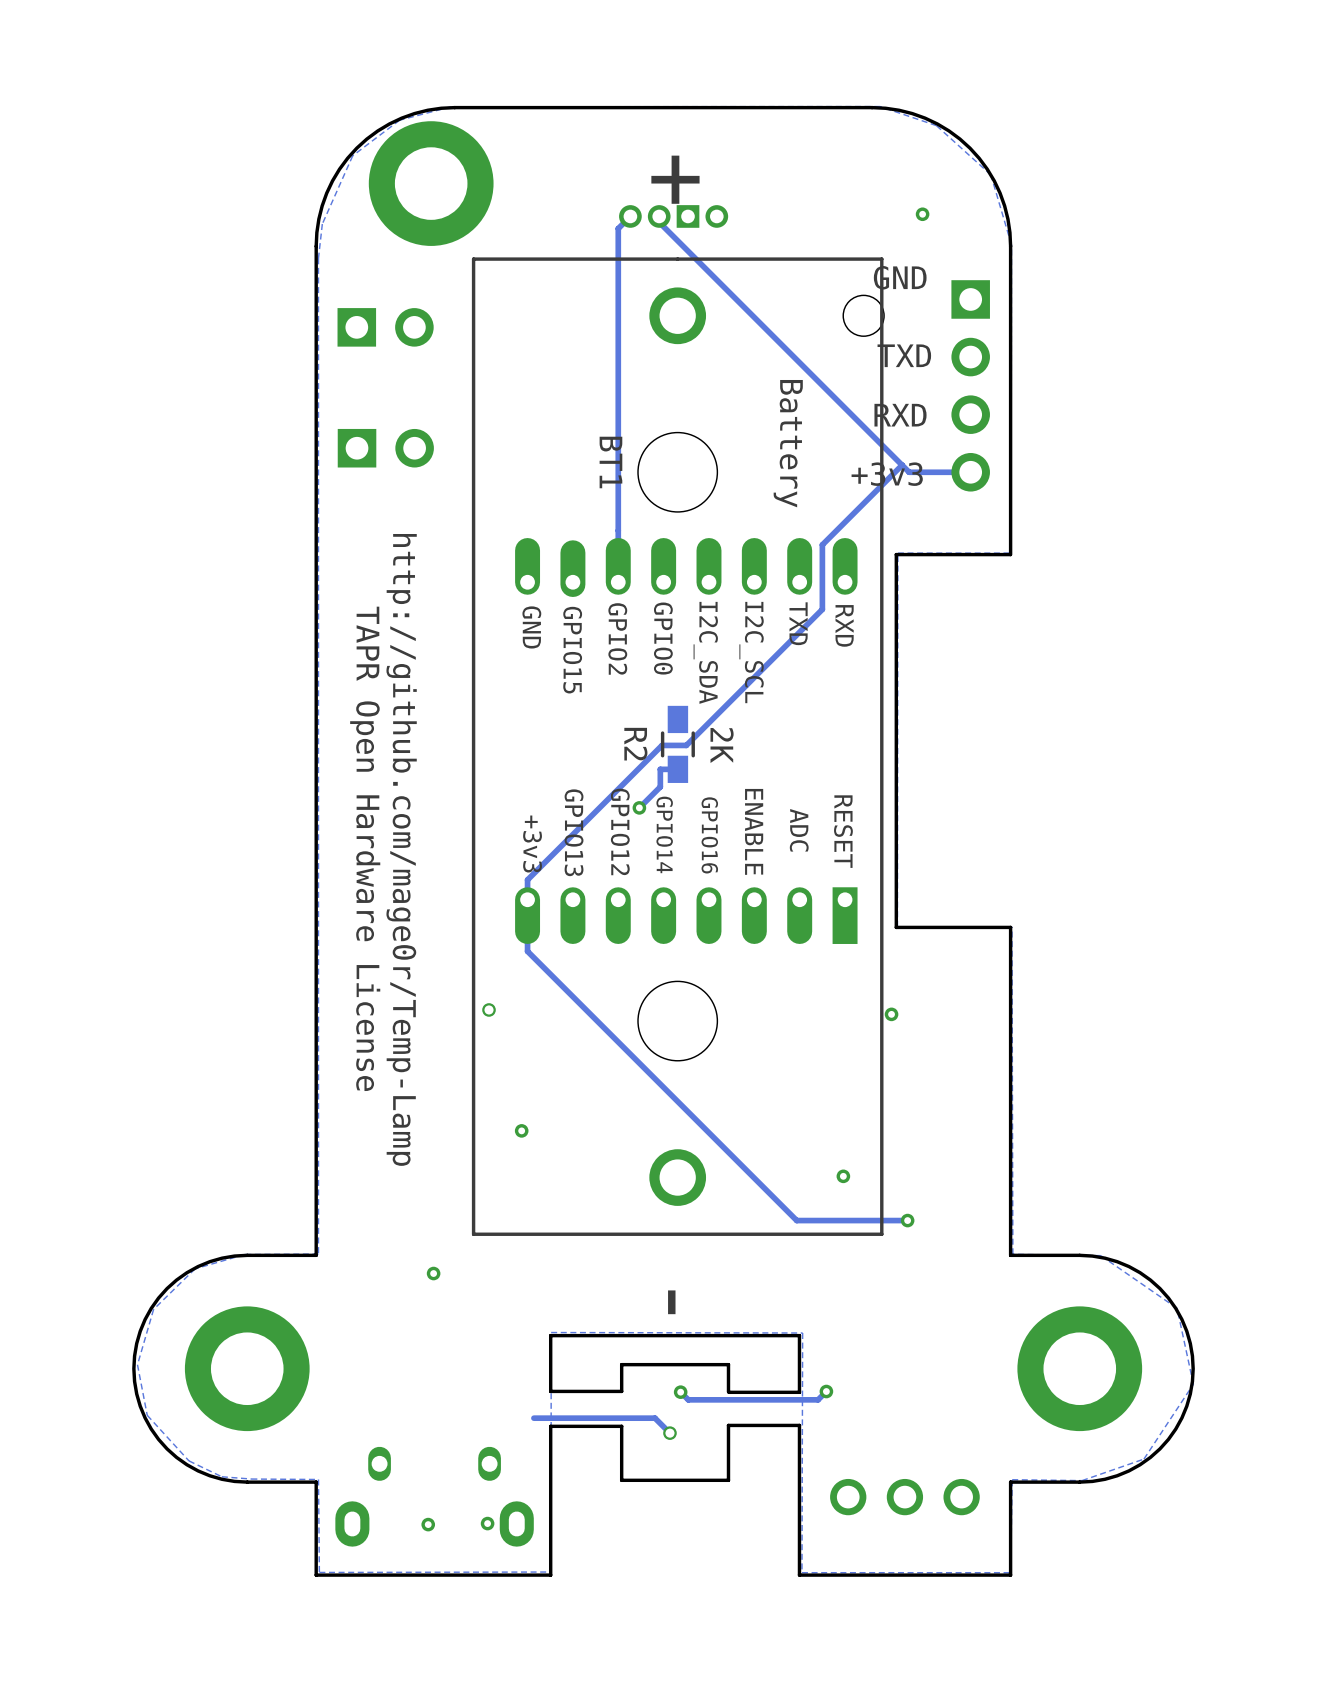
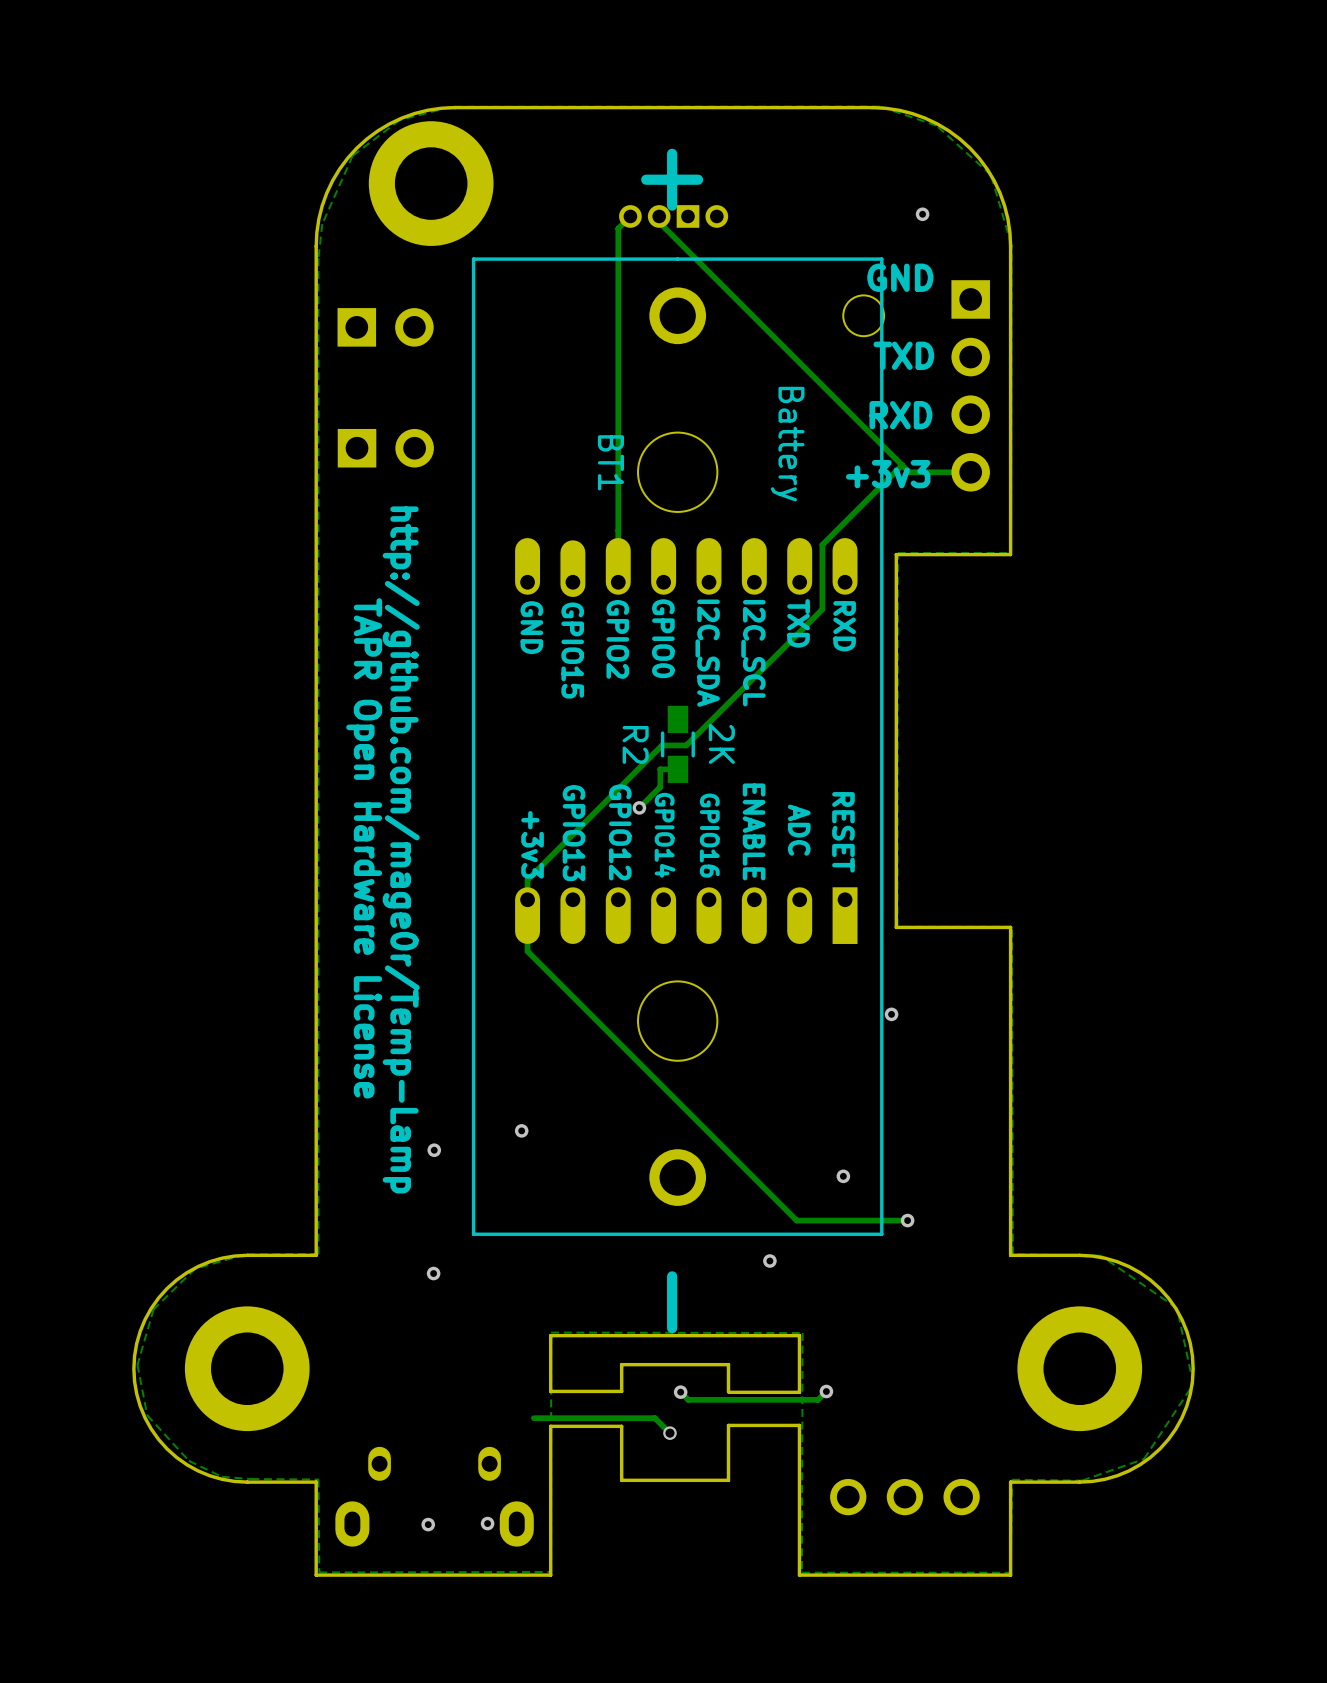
via: (489, 1009) -> none
via: none -> (434, 1150)
via: none -> (769, 1261)

